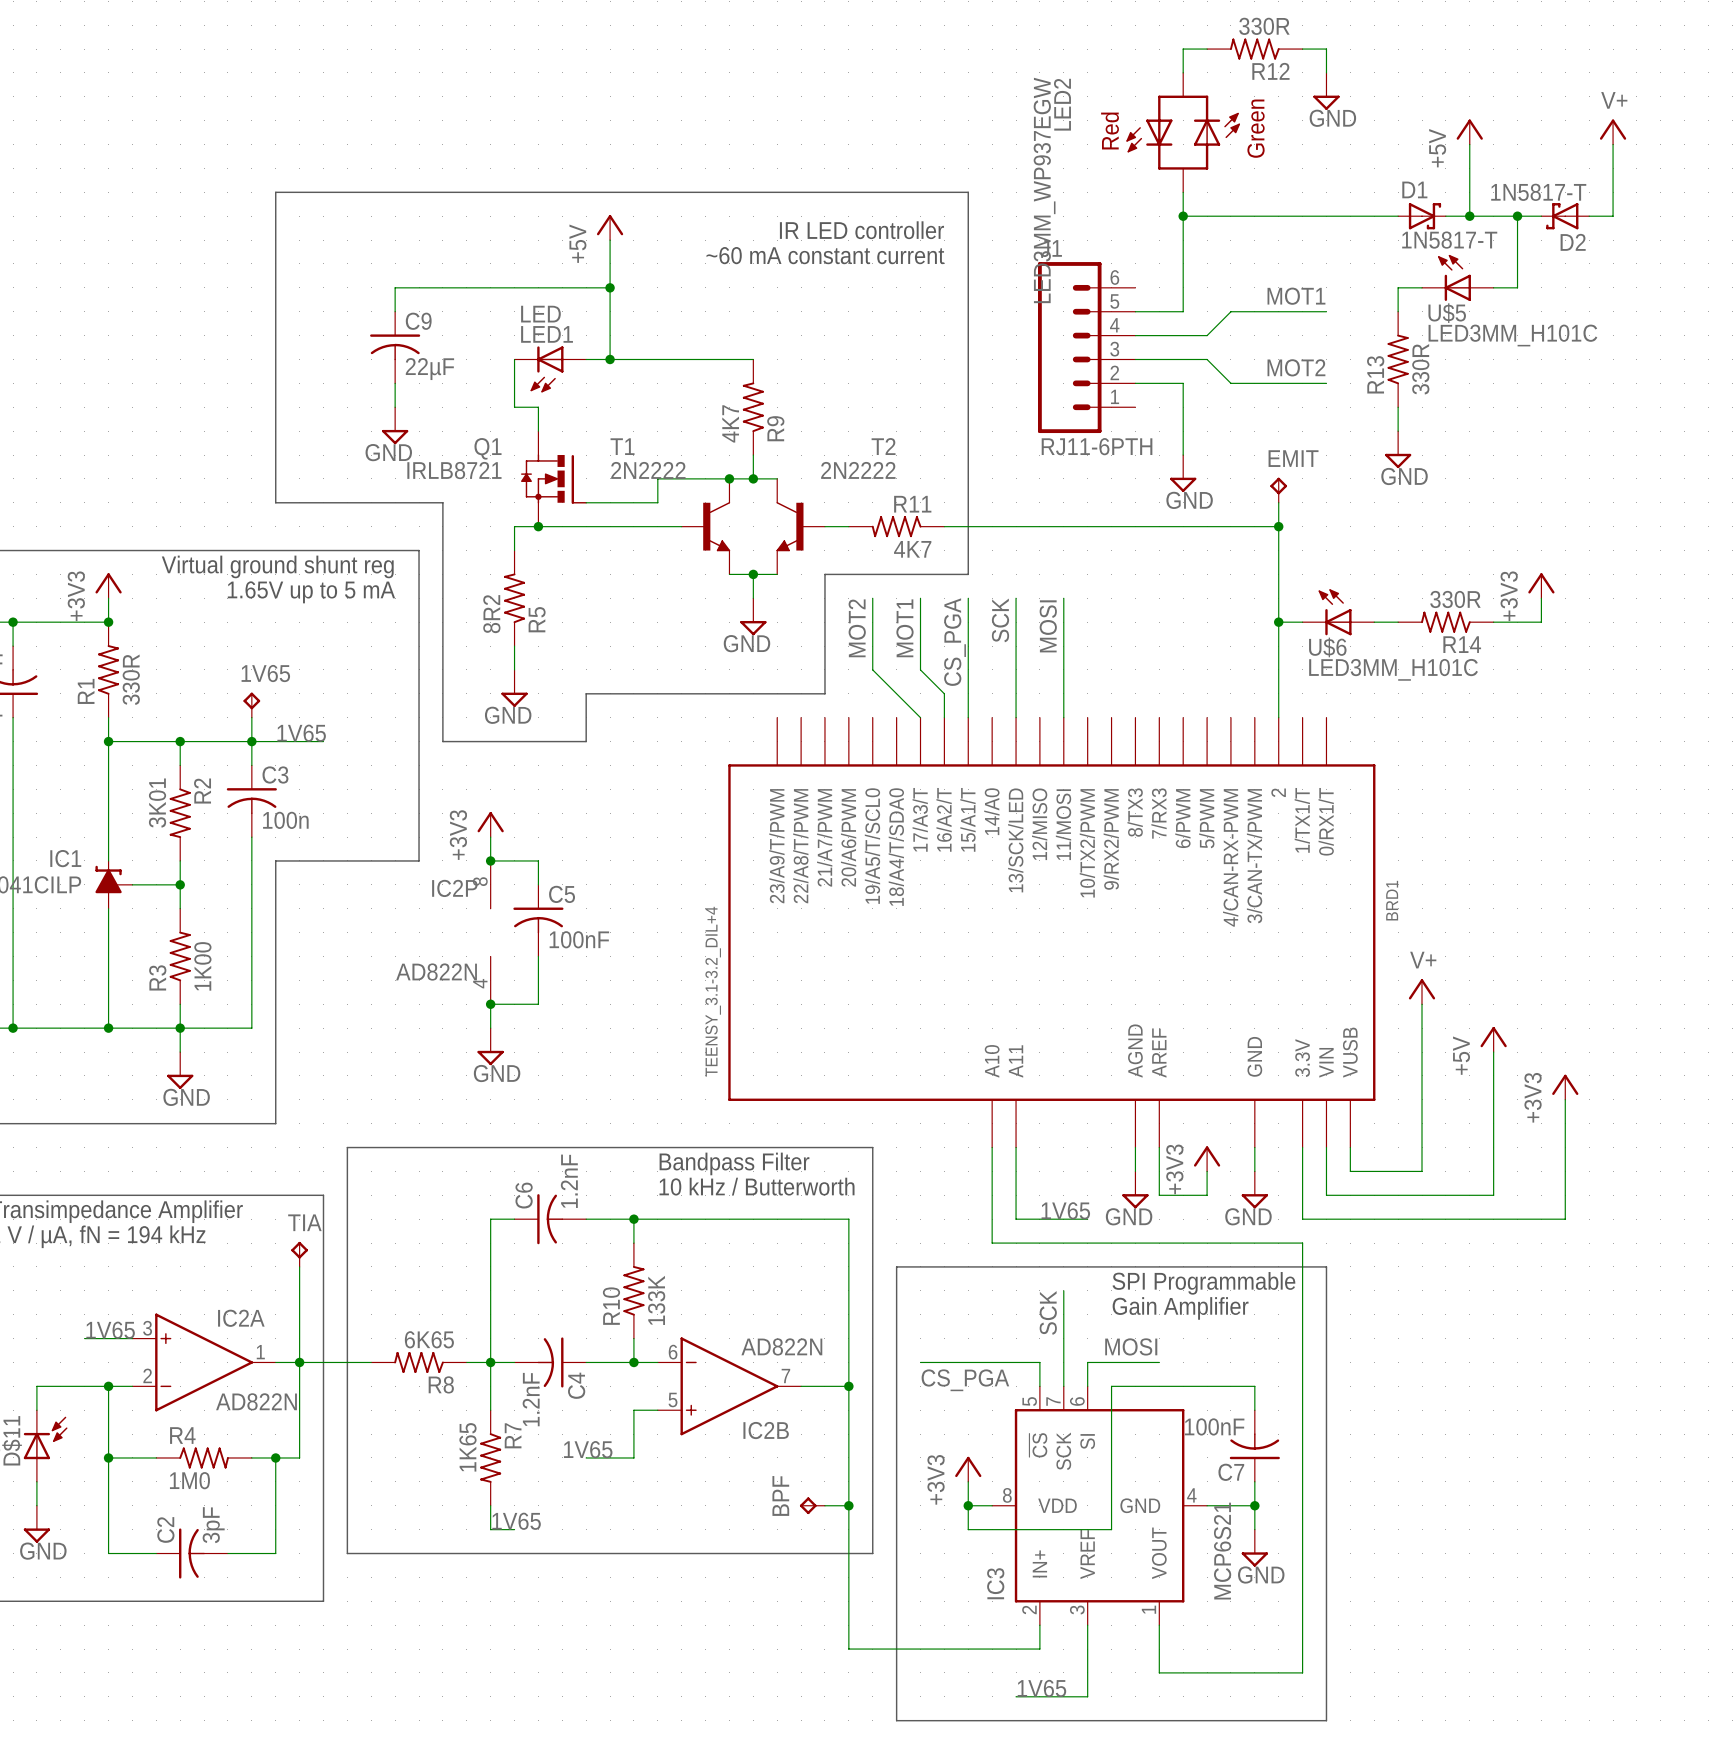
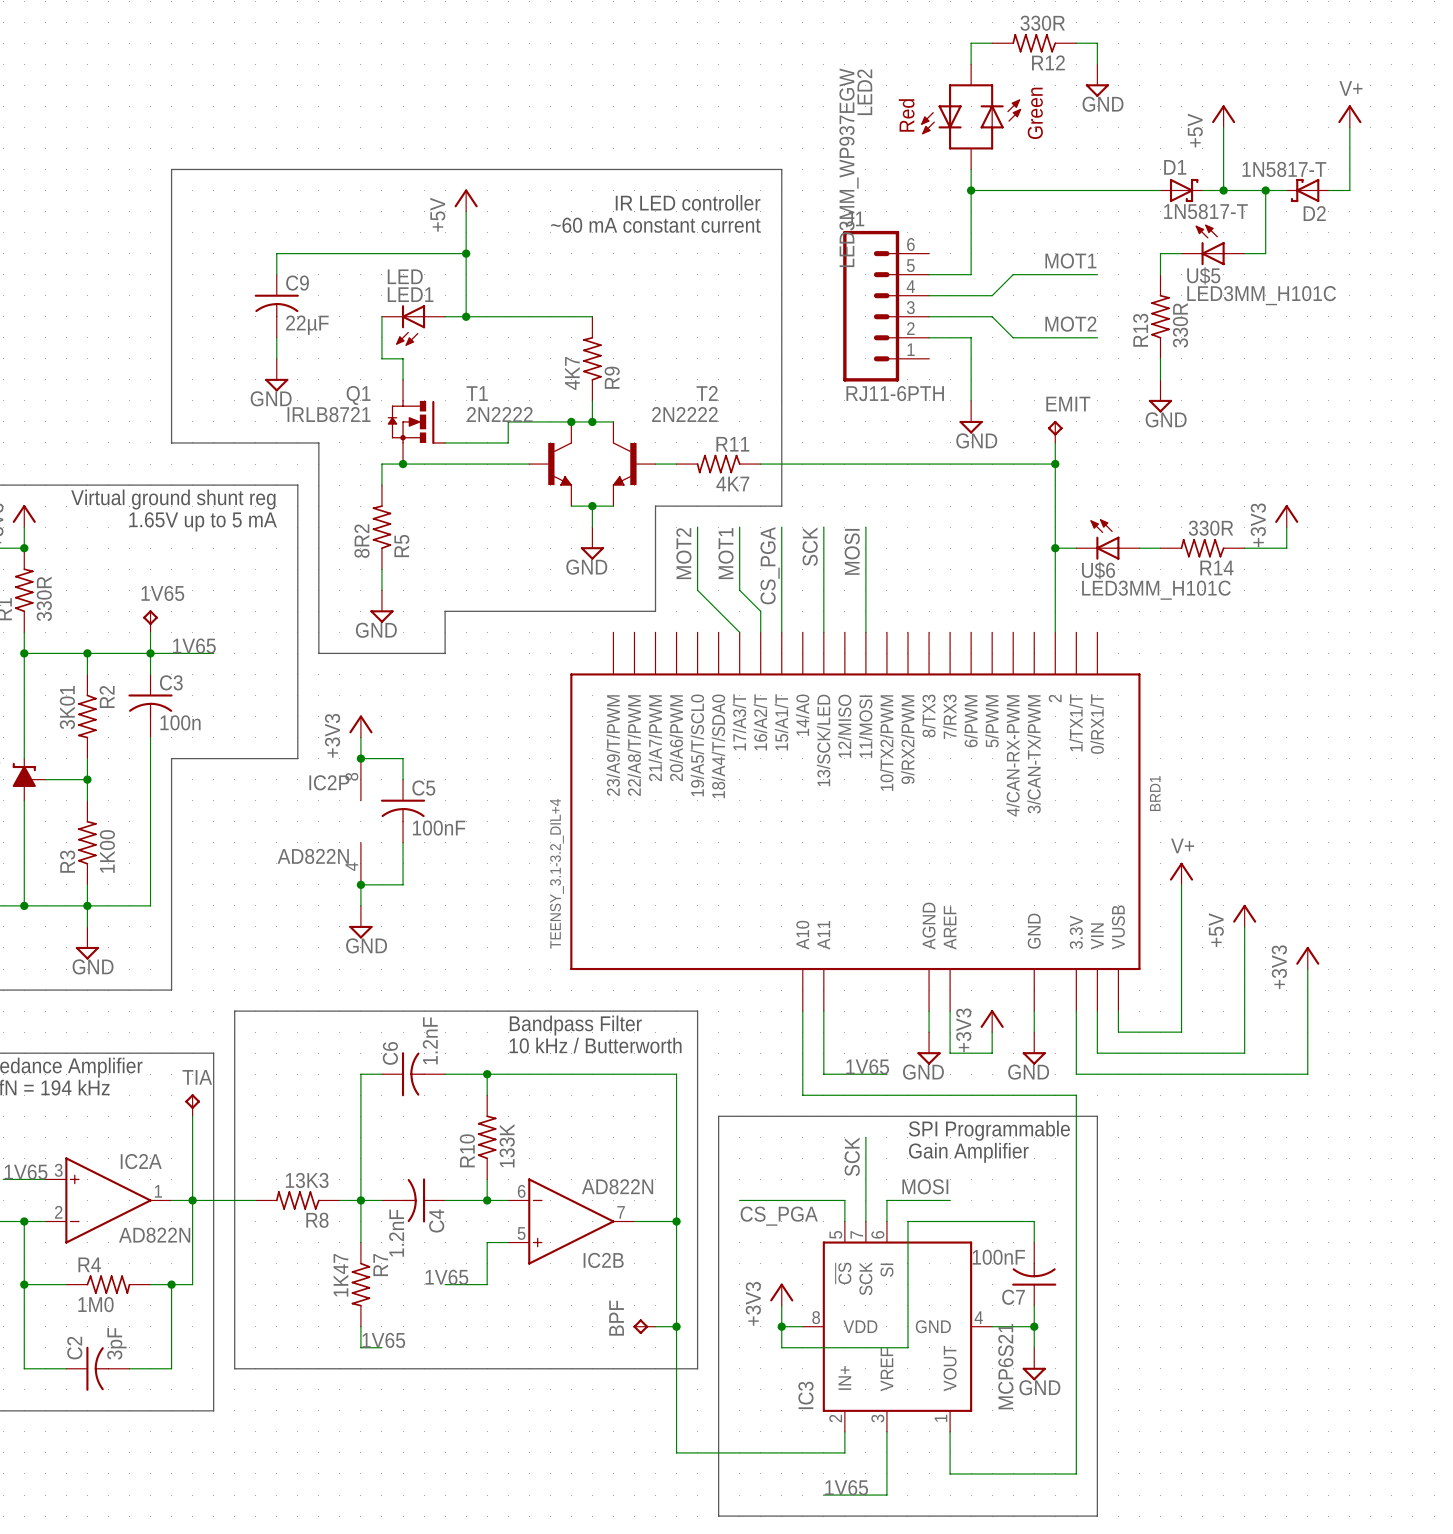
R8 value: 6K65 (429, 1339) -> 13K3 (307, 1180)
R7 value: 1K65 (467, 1447) -> 1K47 (340, 1275)

